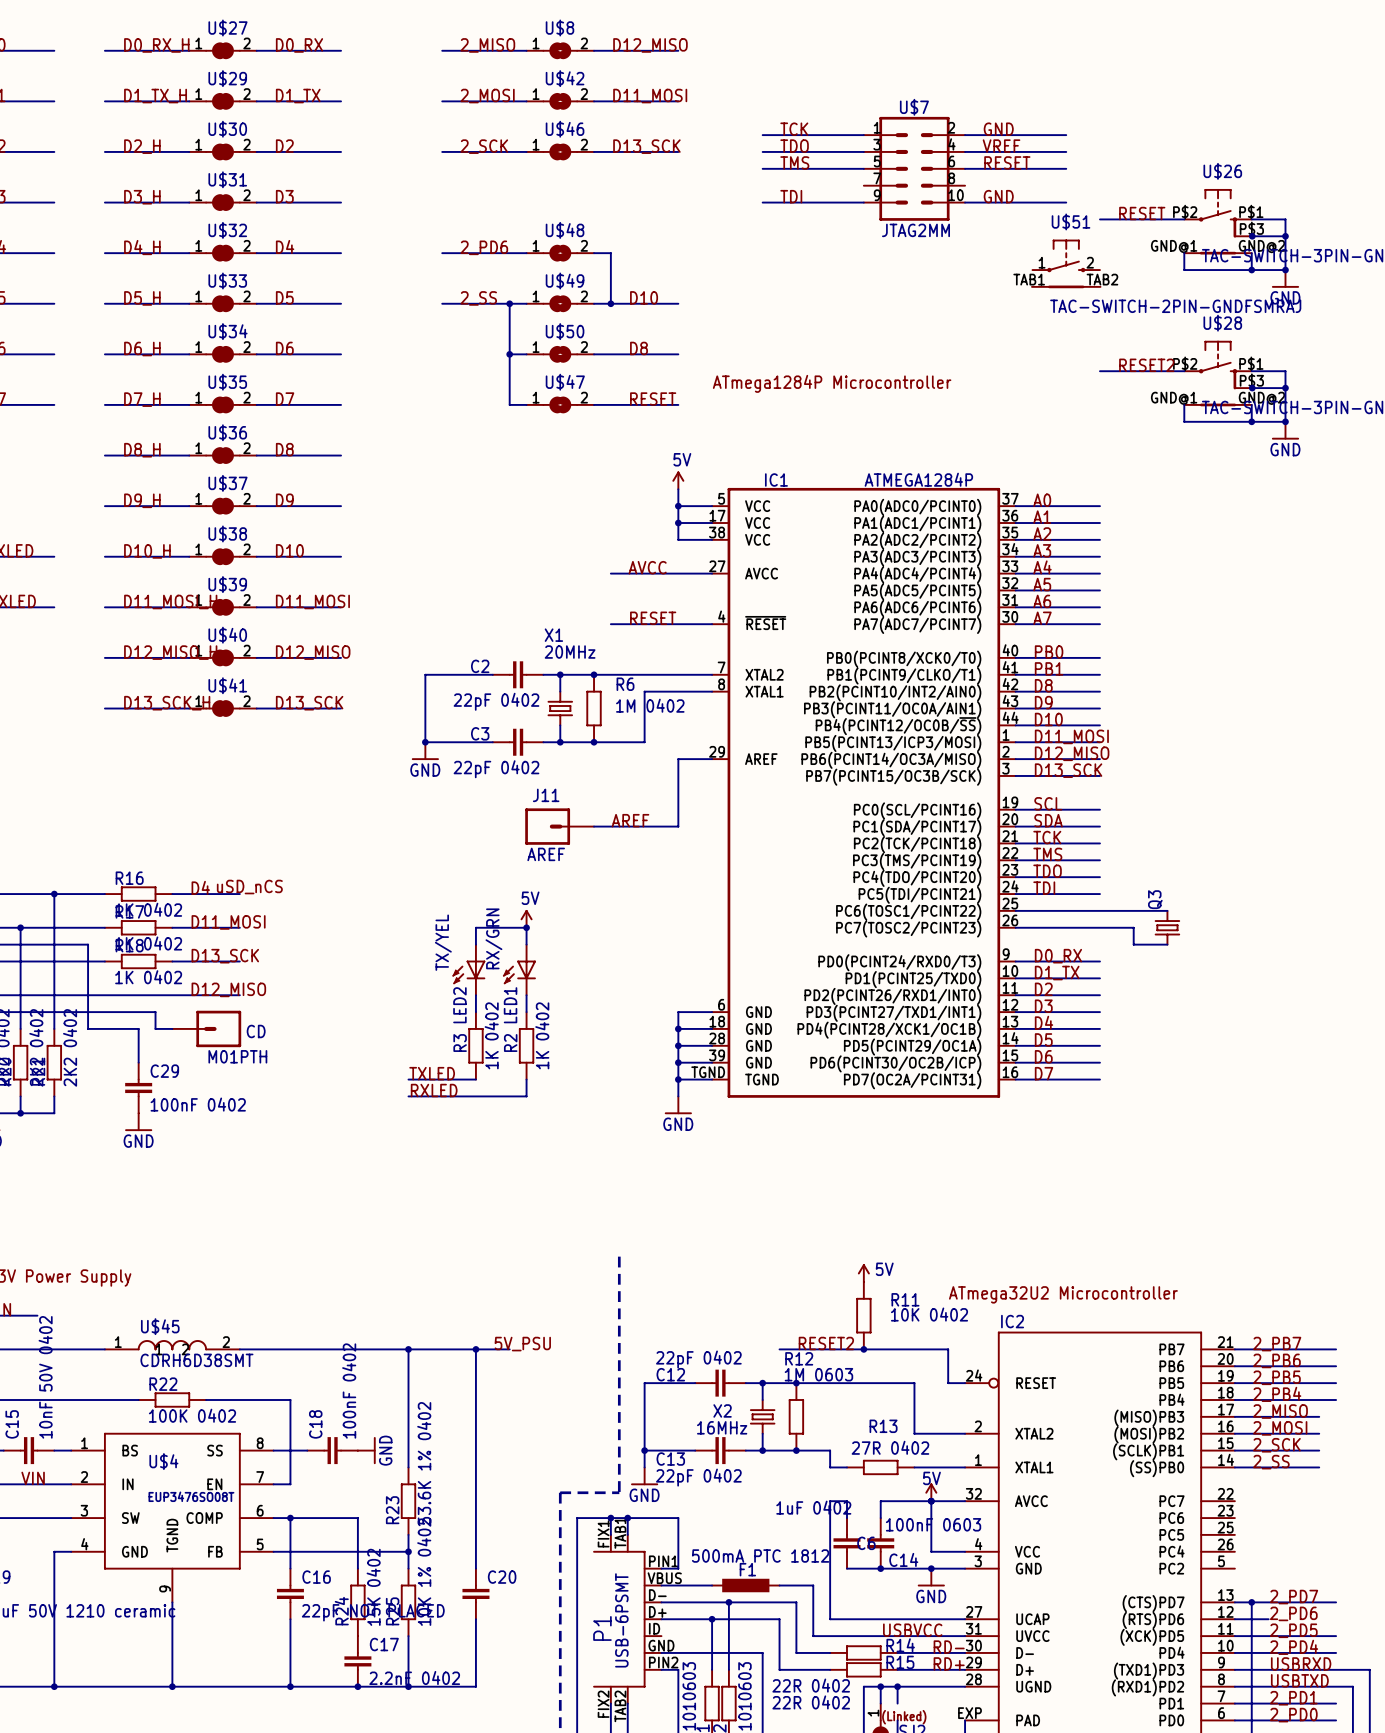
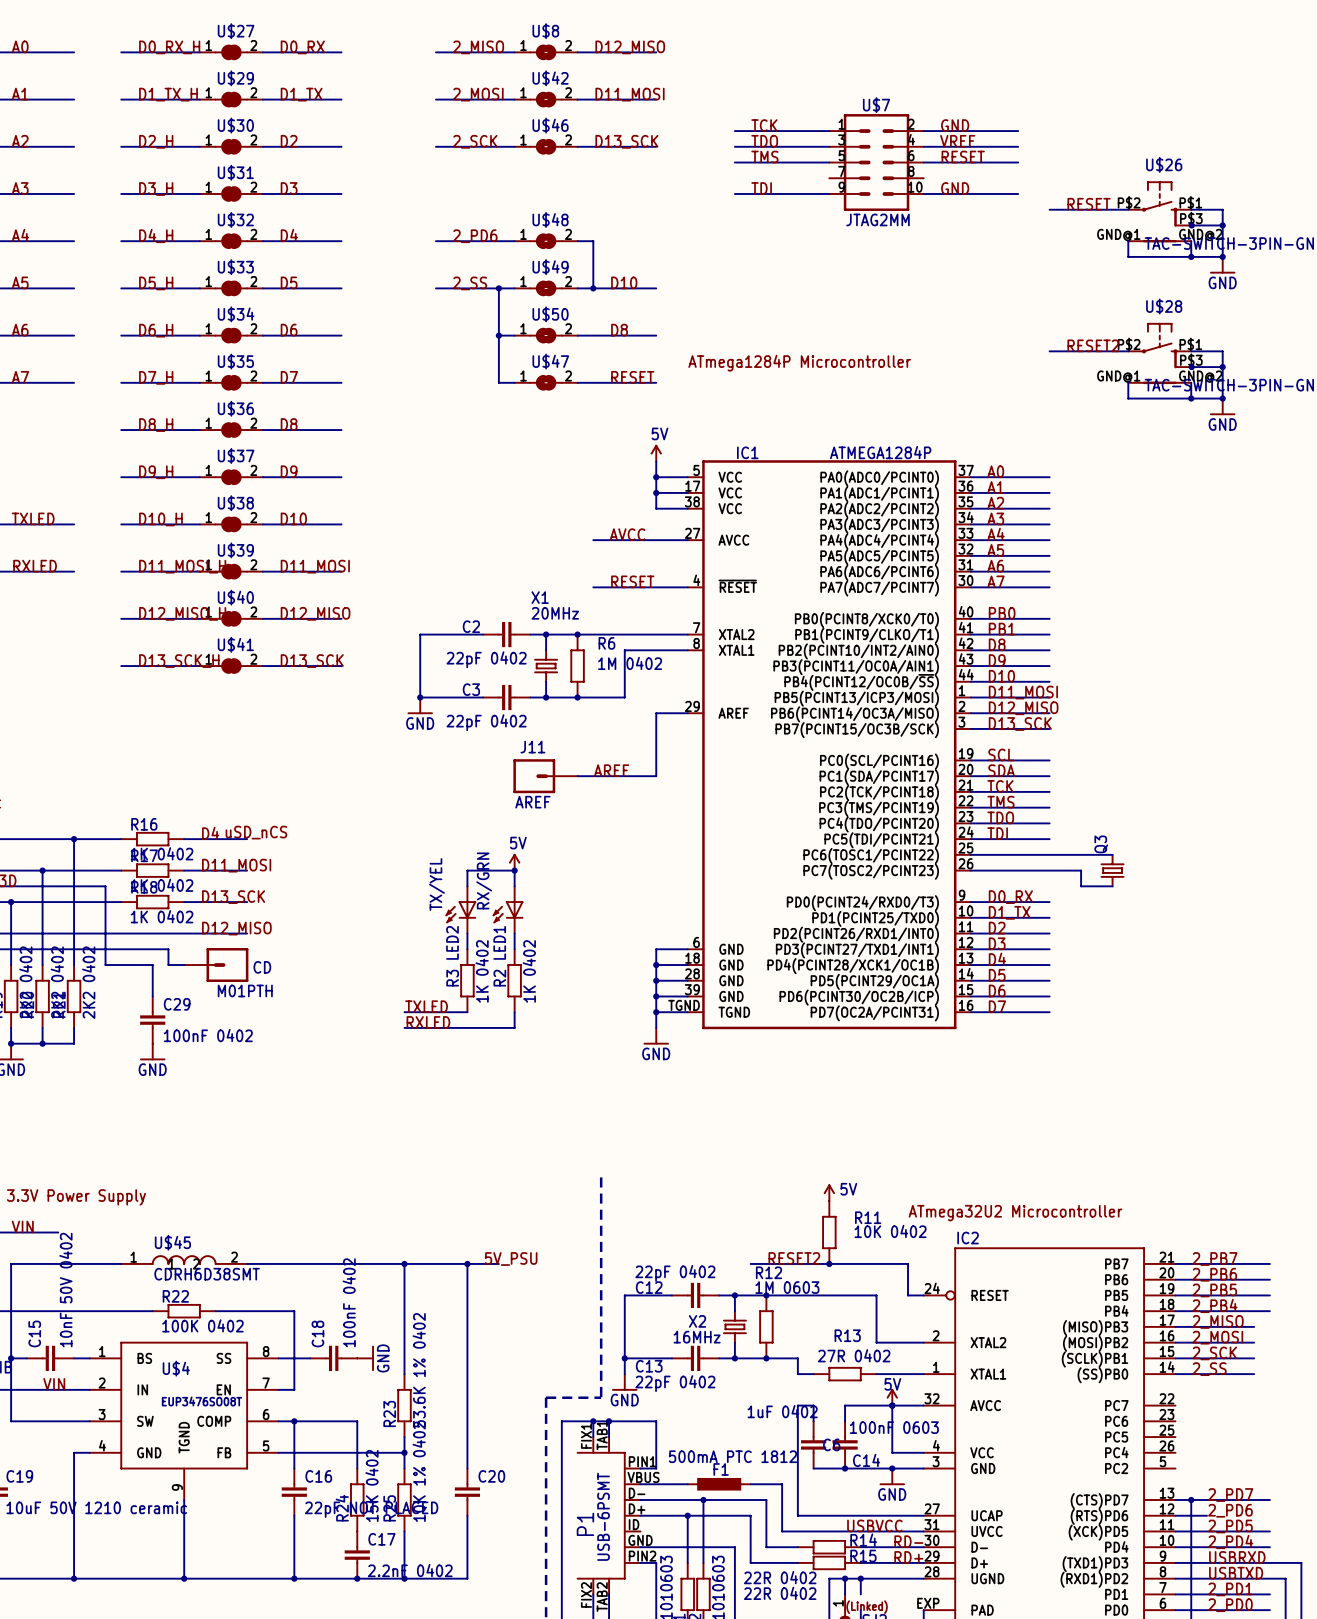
U$51: TAC-SWITCH-2PIN-GNDFSMRAJ (1066, 263) -> none

